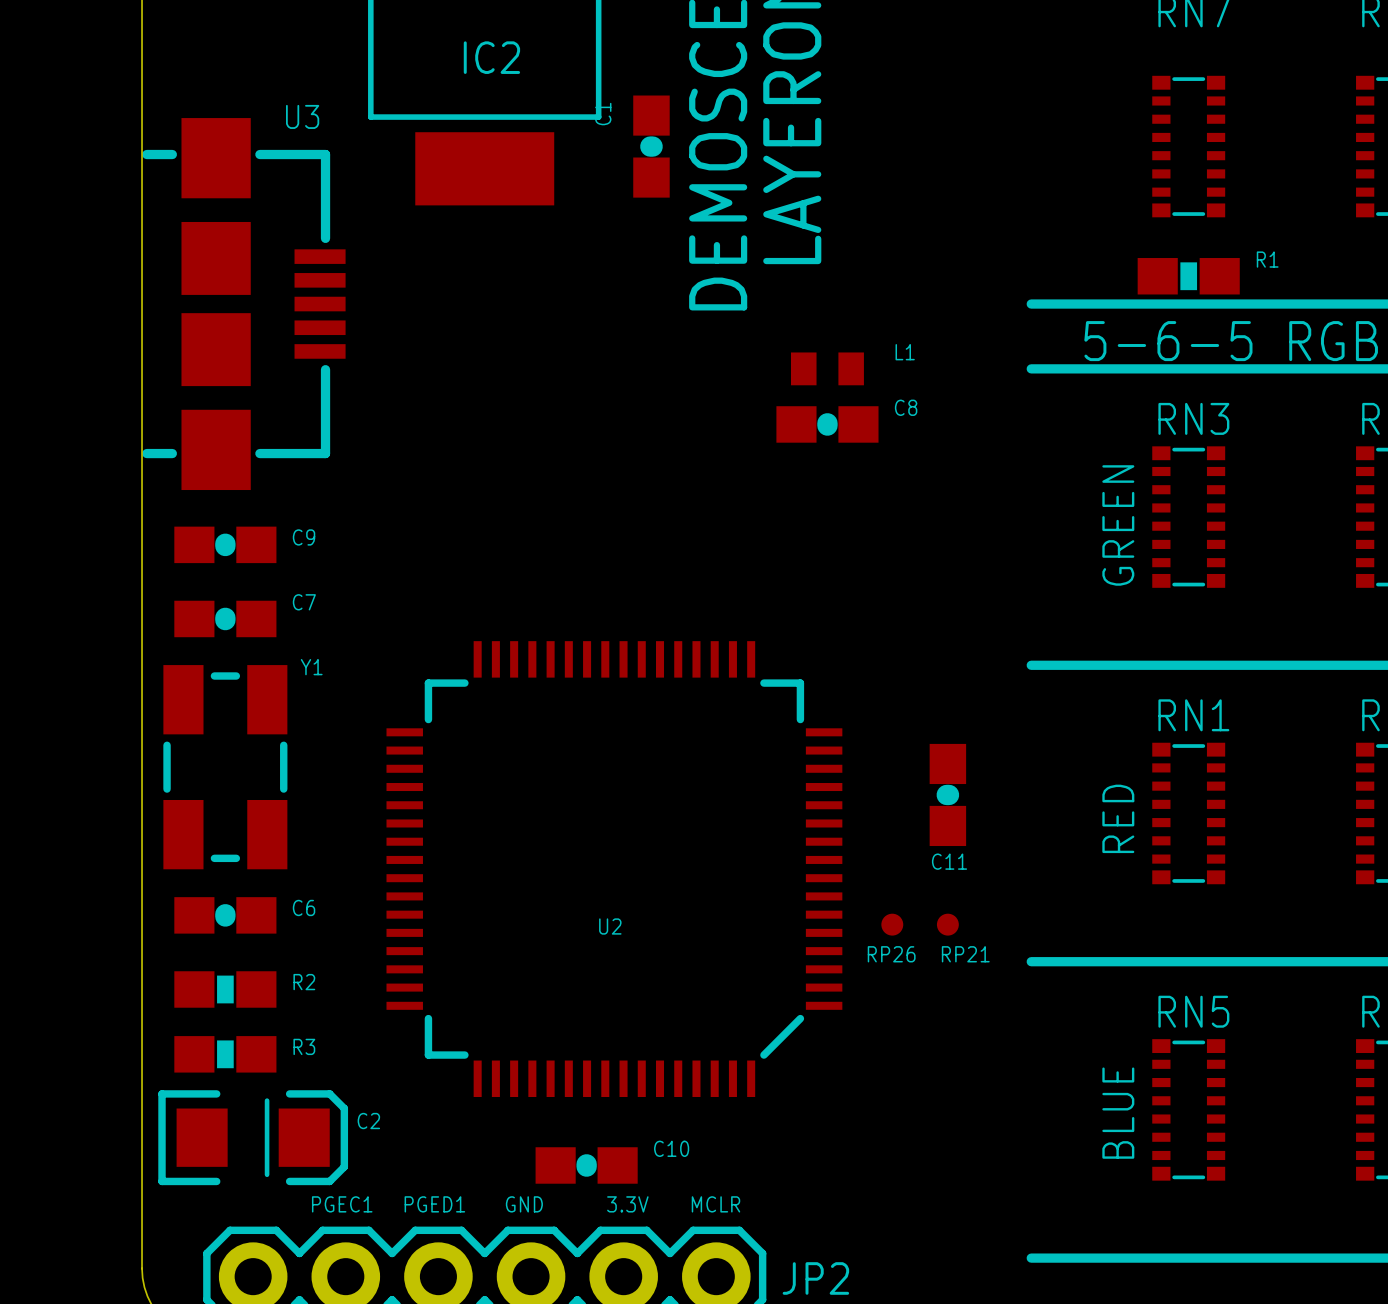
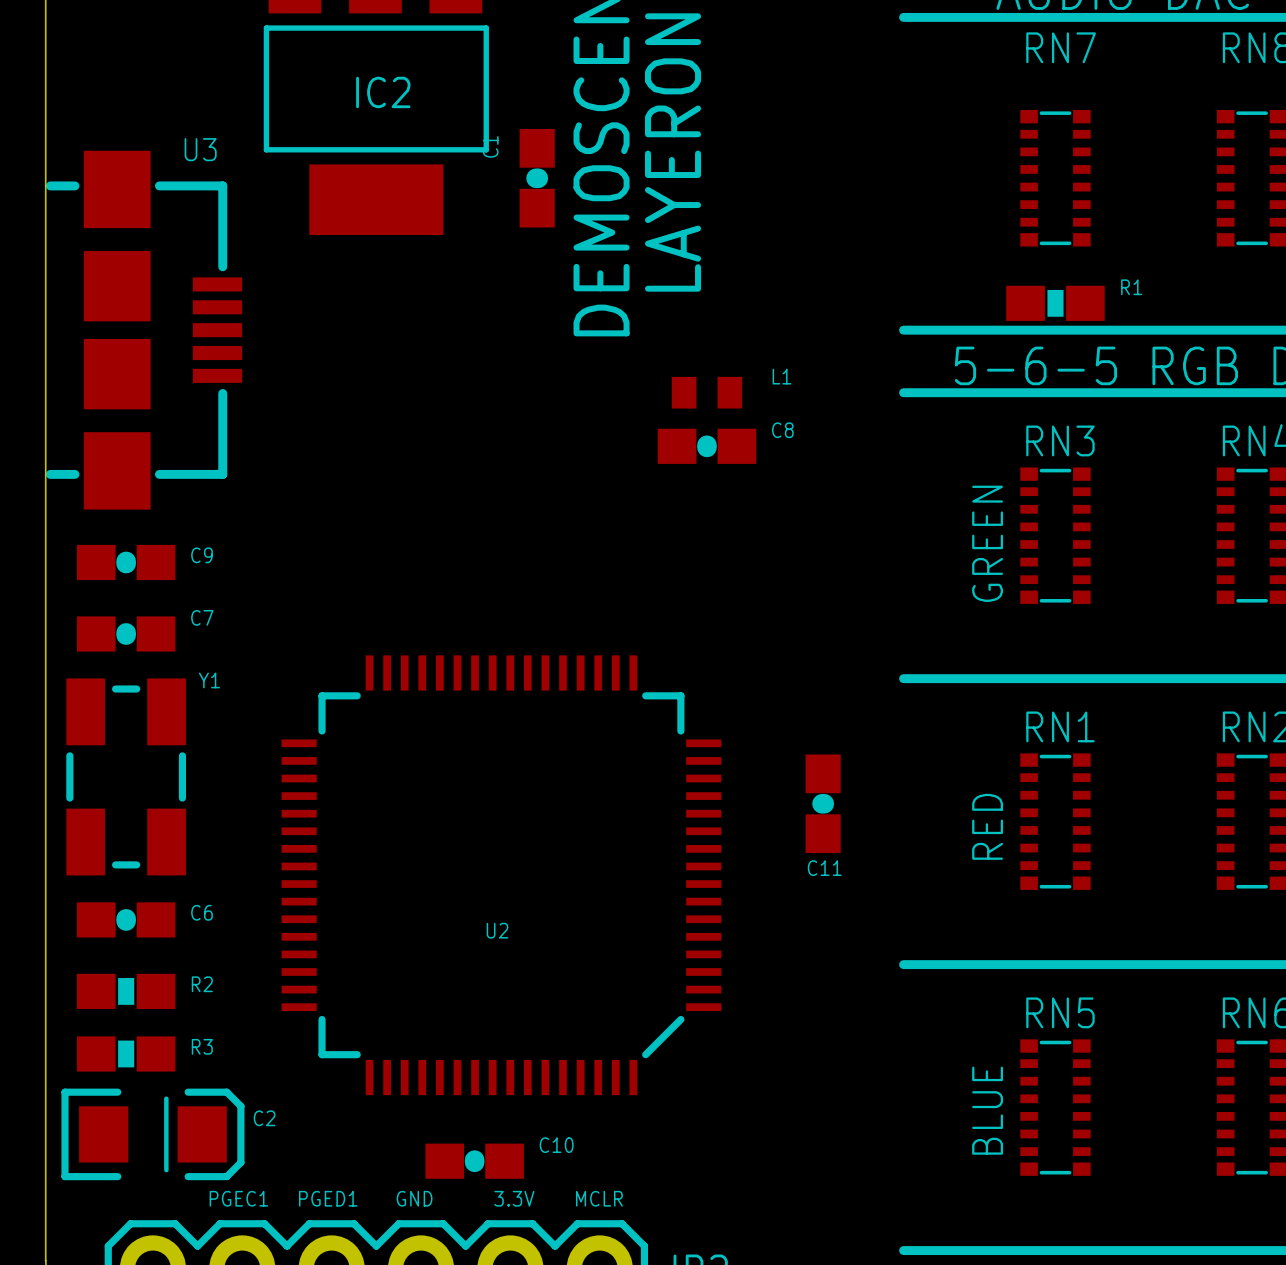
RP26: (892, 924) -> none
RP21: (947, 924) -> none

